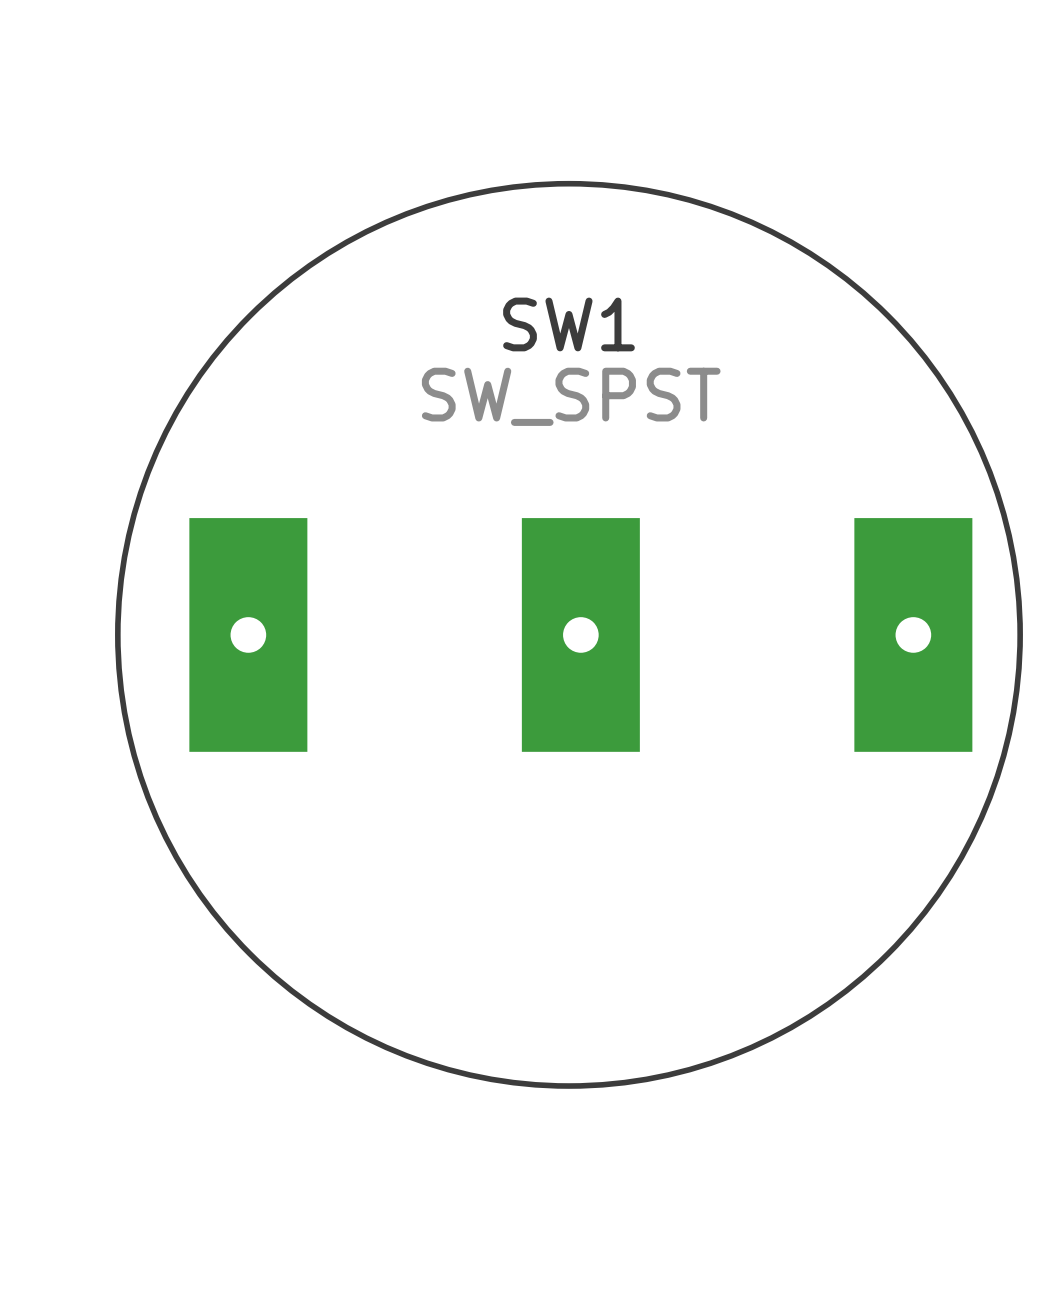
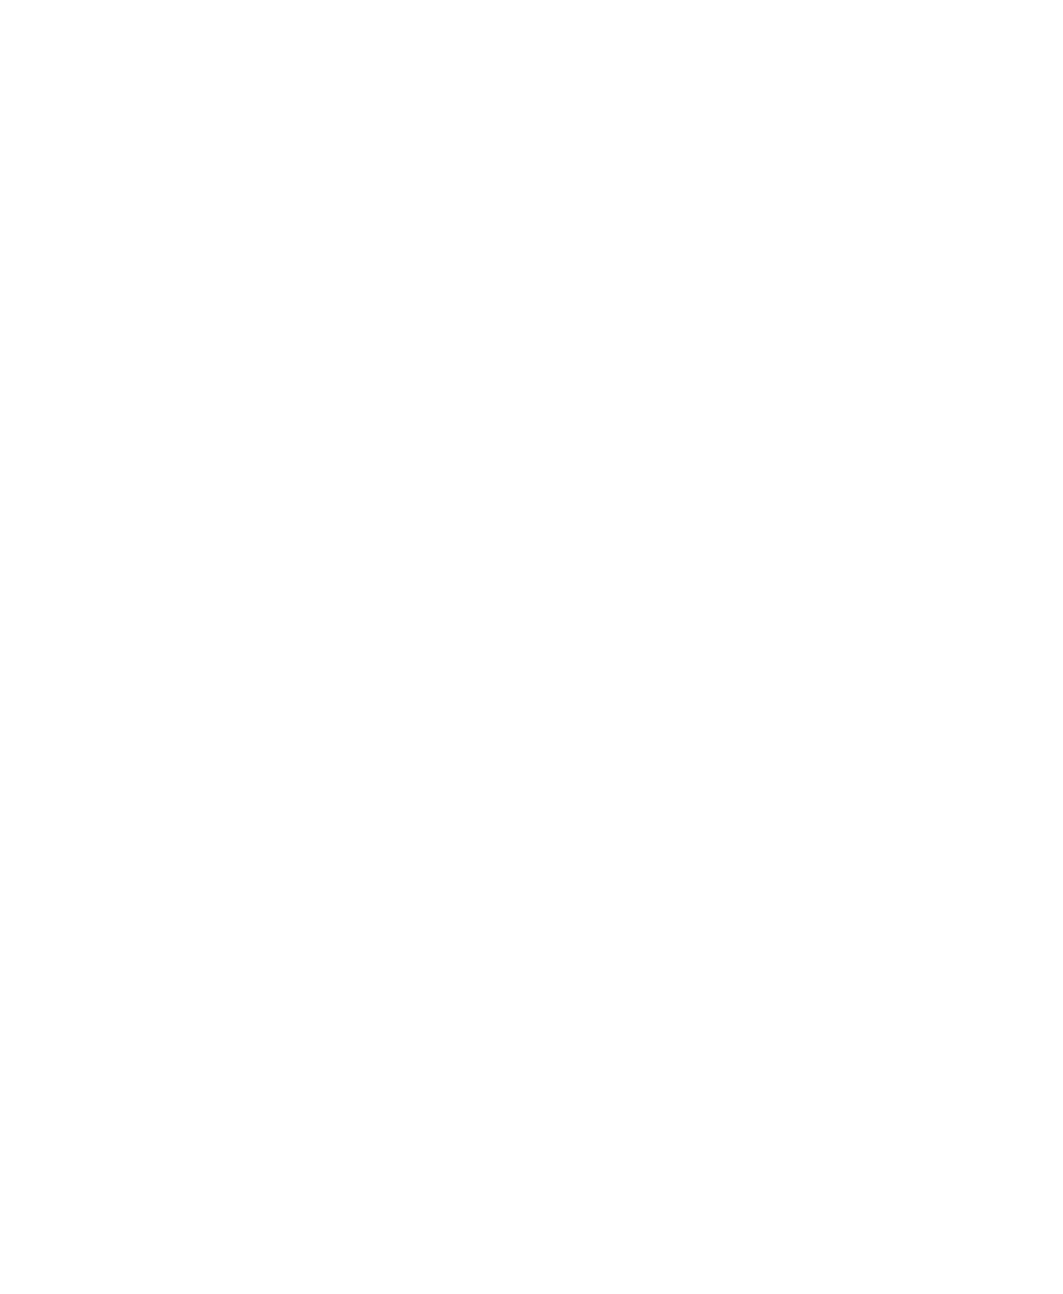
SW1: SW_SPST (568, 634) -> none

